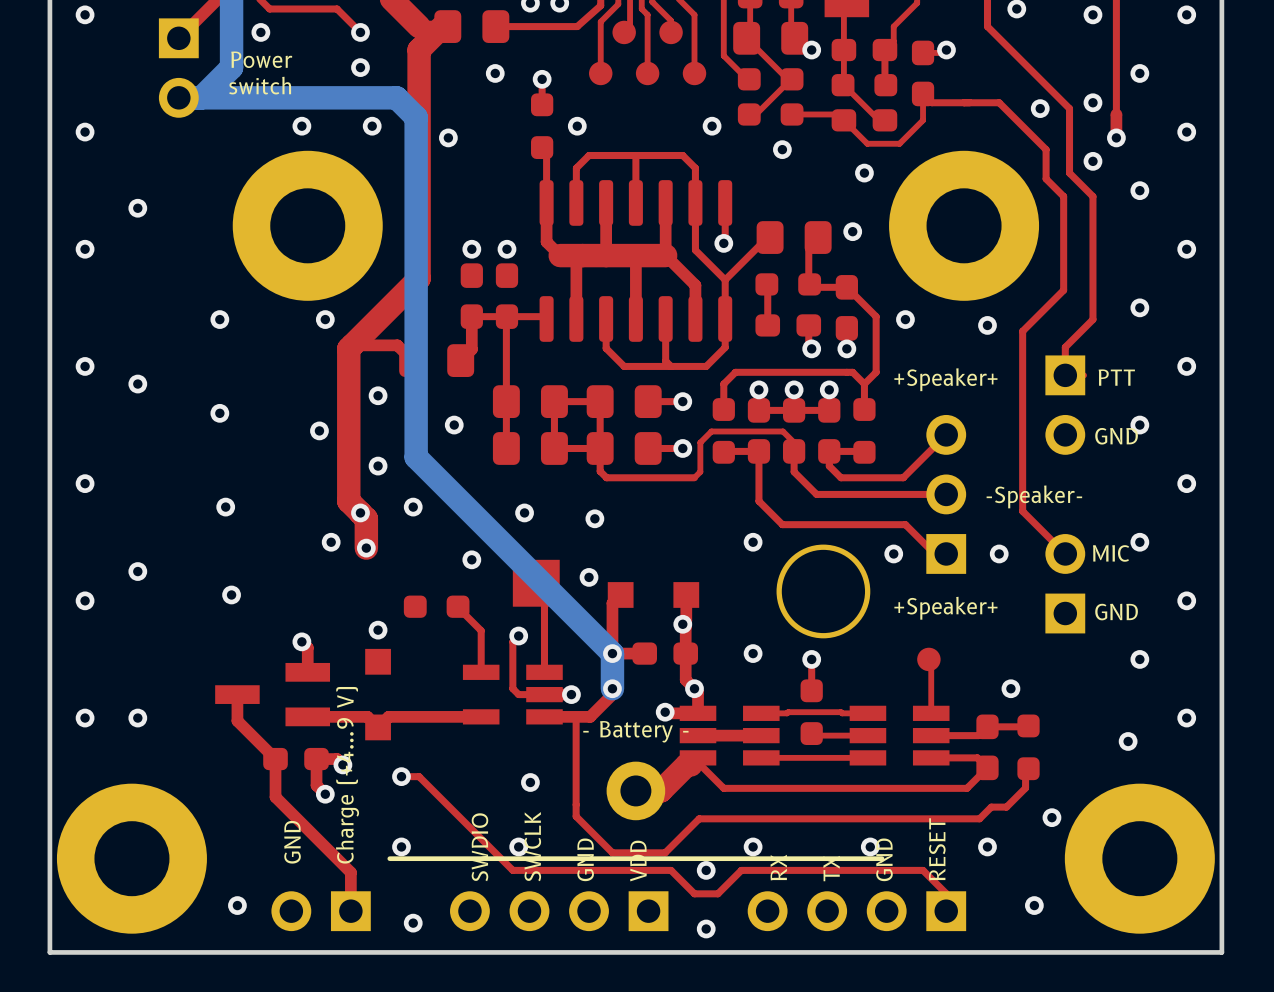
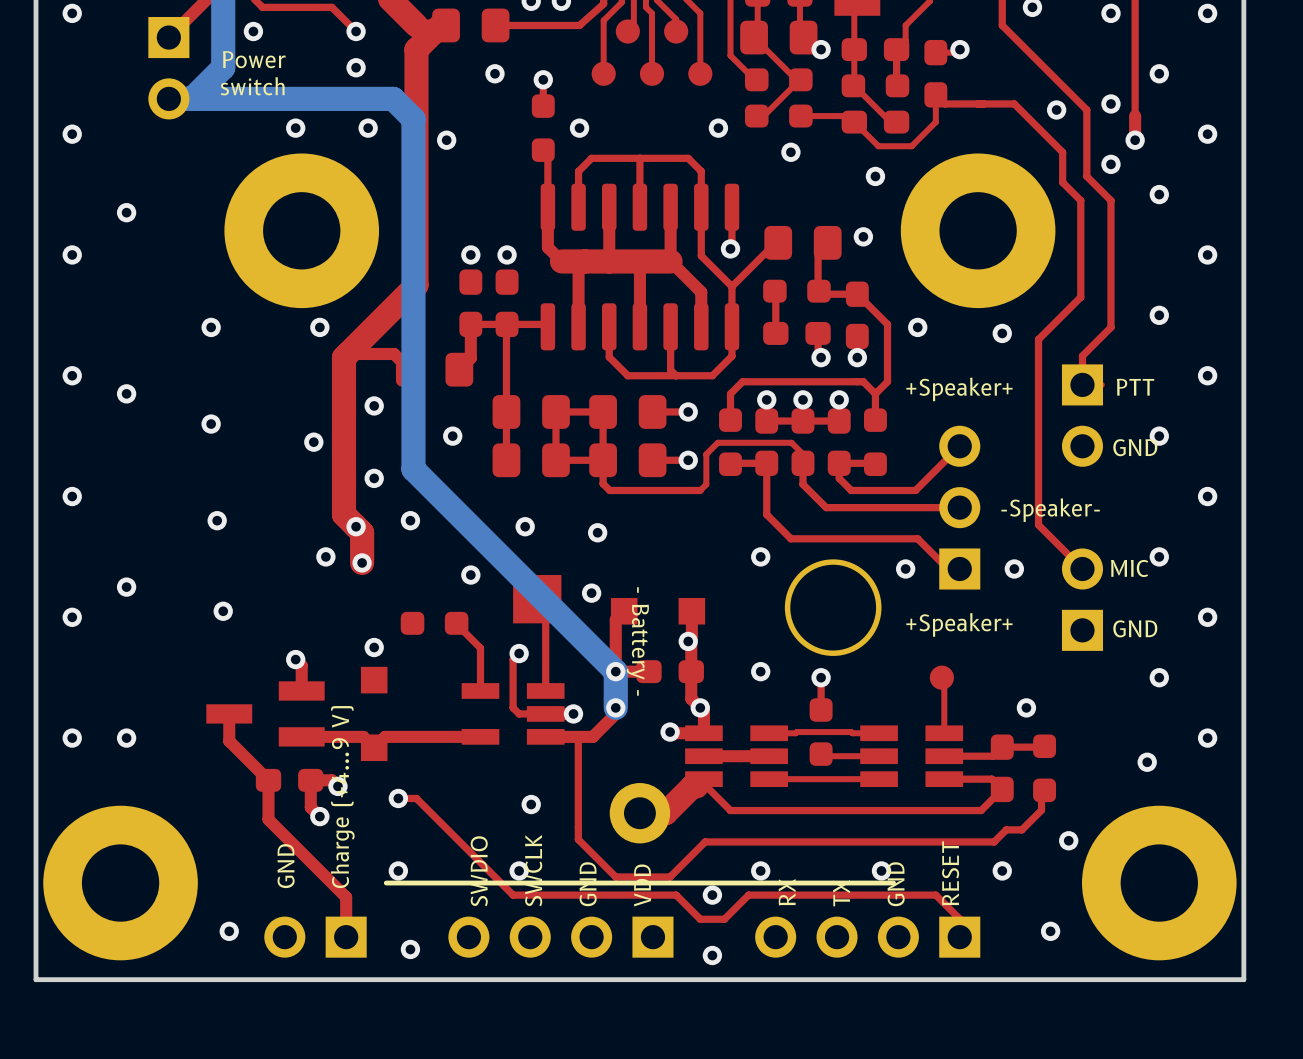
text rotation: 0° (635, 731) -> 90° clockwise (637, 641)

